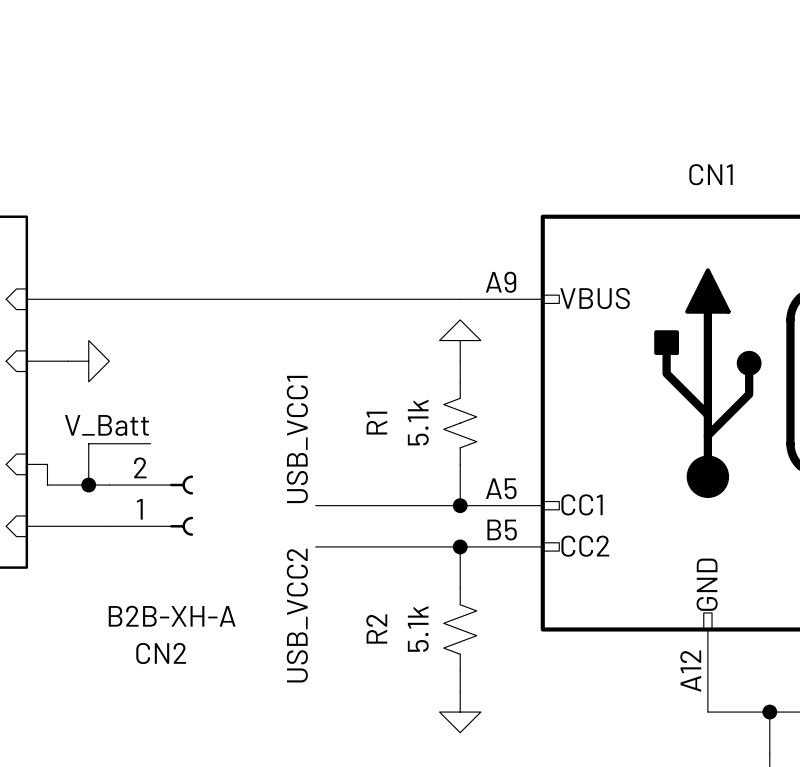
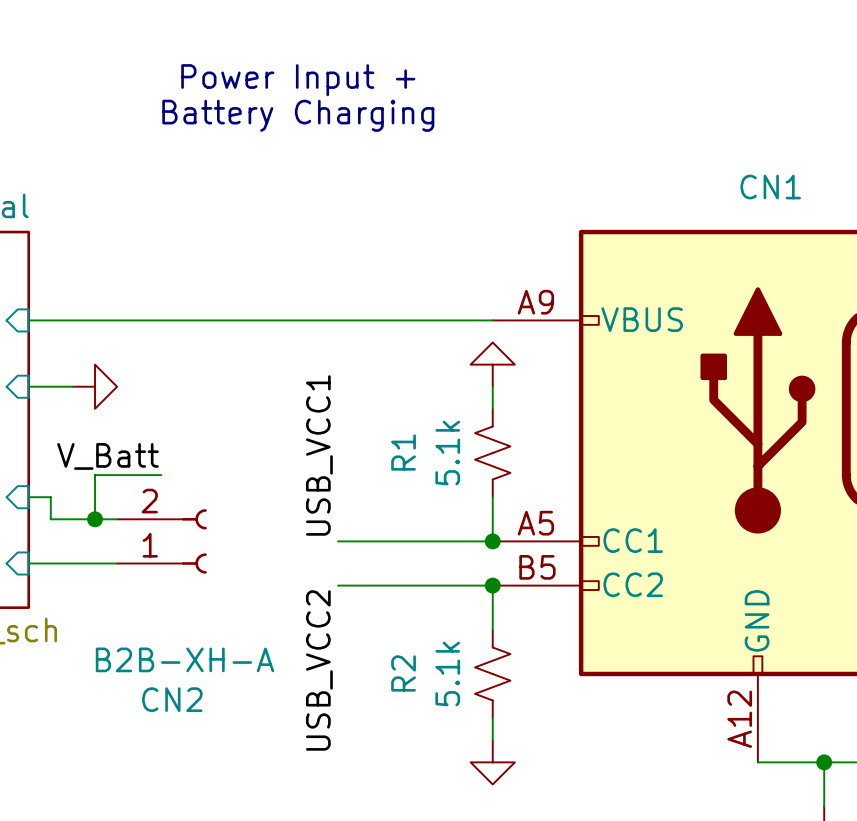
text: none -> Power Input + (298, 80)
text: none -> Battery Charging (298, 115)

